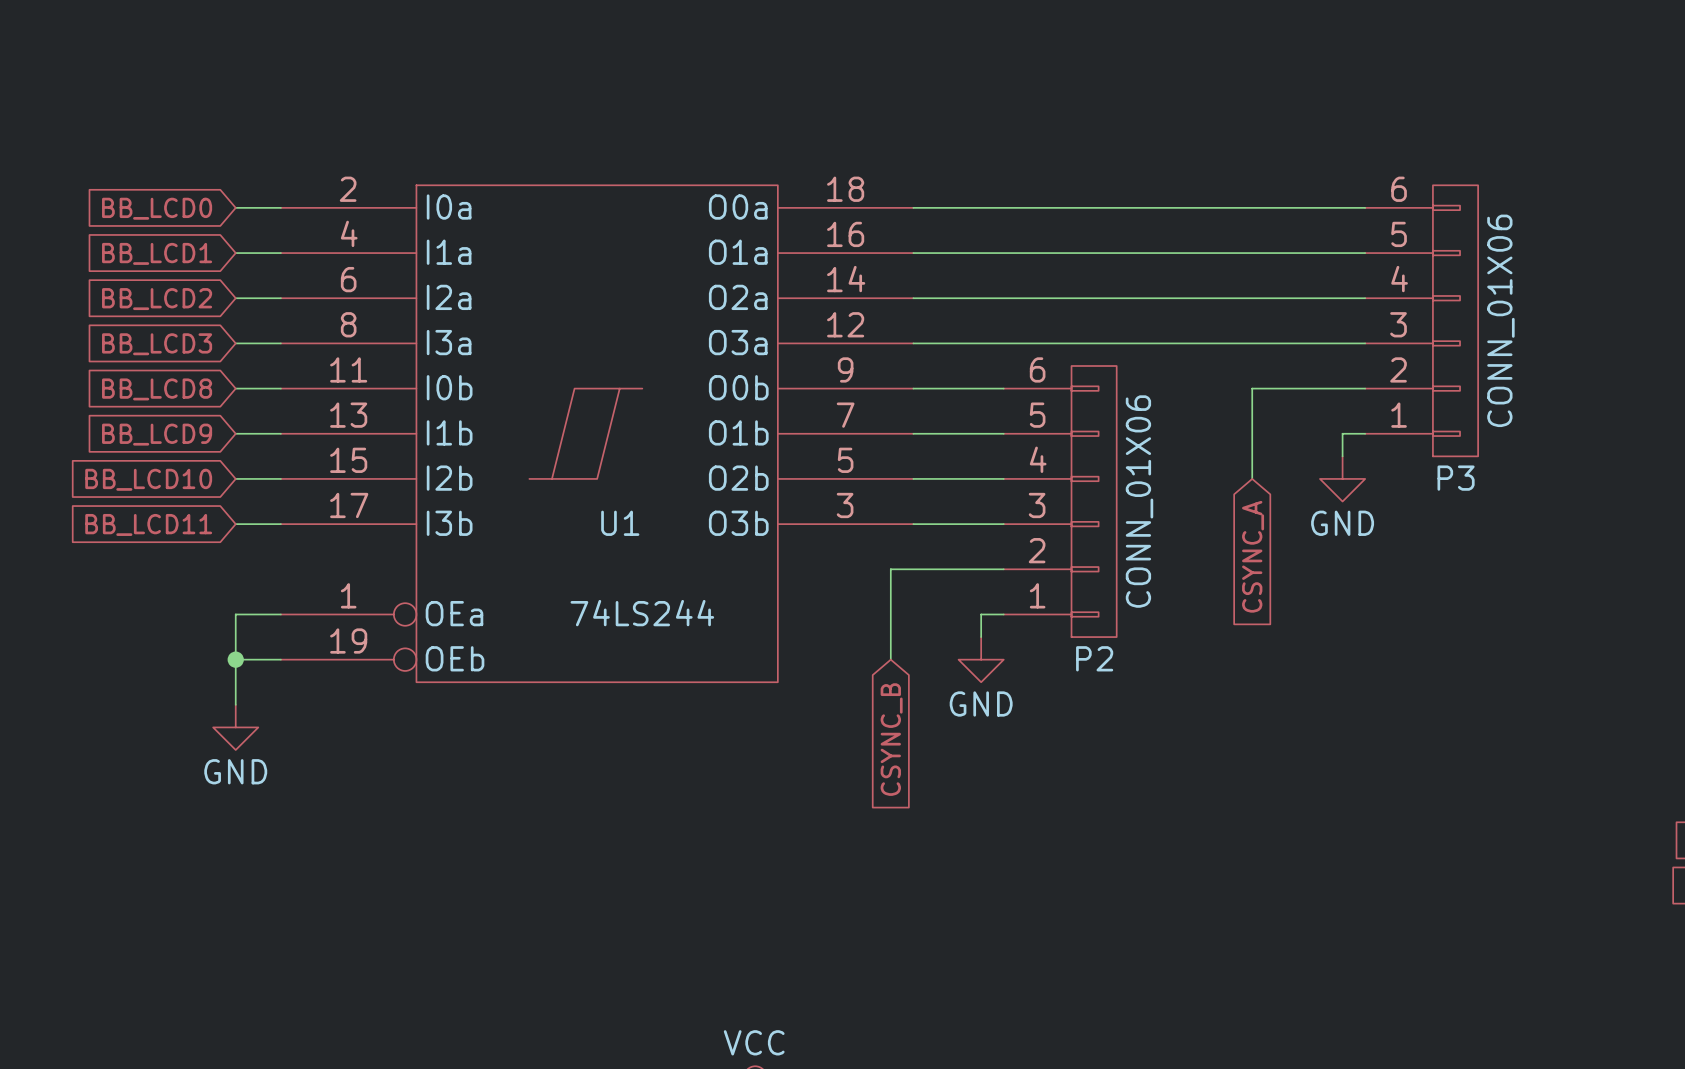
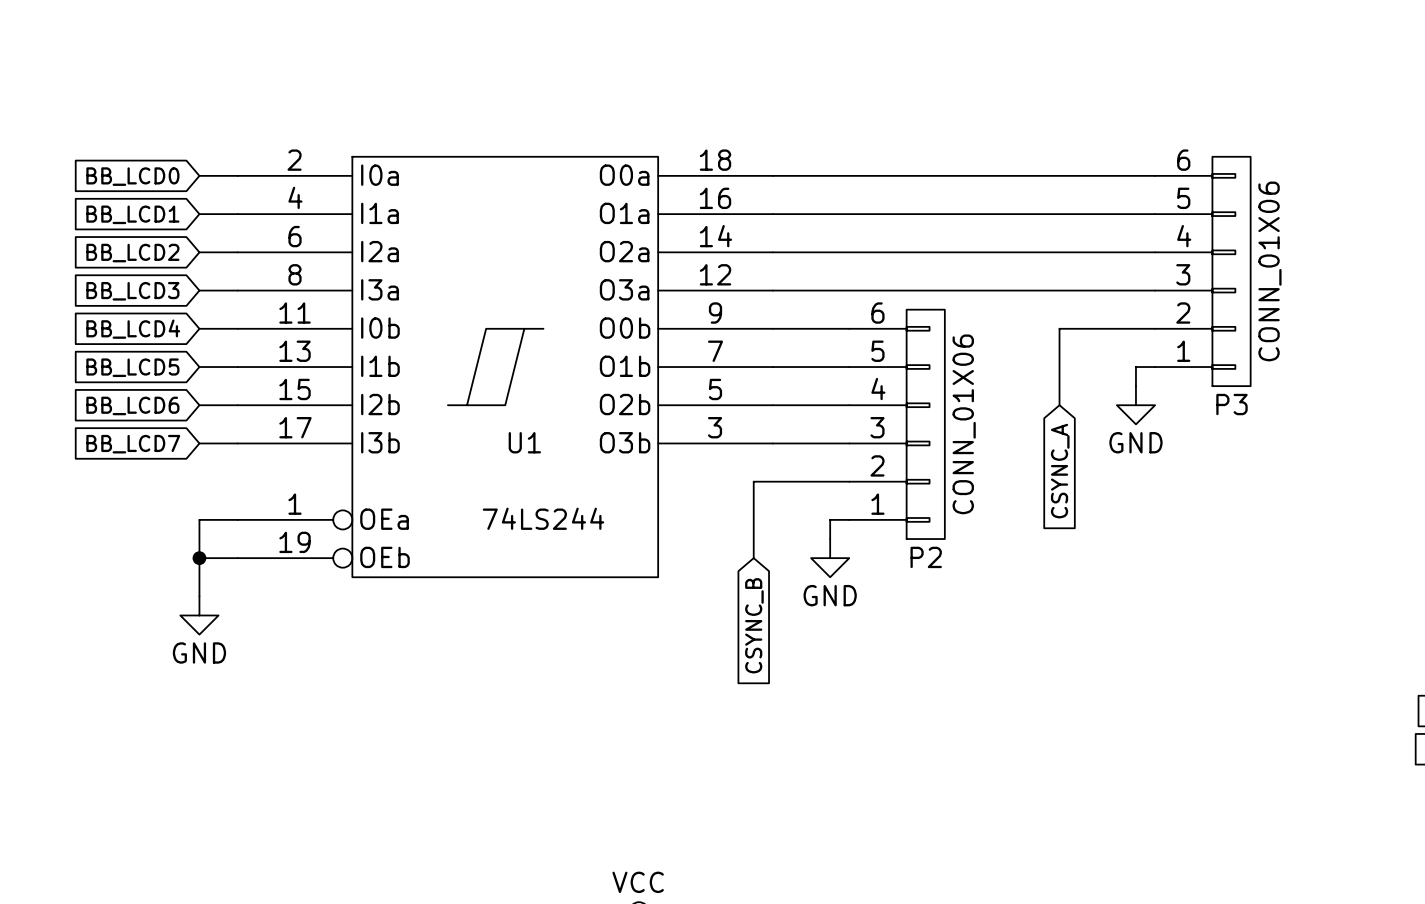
global label: BB_LCD8 (157, 389) -> BB_LCD4 (133, 329)
global label: BB_LCD9 (157, 434) -> BB_LCD5 (132, 367)
global label: BB_LCD10 (148, 479) -> BB_LCD6 (132, 405)
global label: BB_LCD11 (148, 524) -> BB_LCD7 (133, 444)

